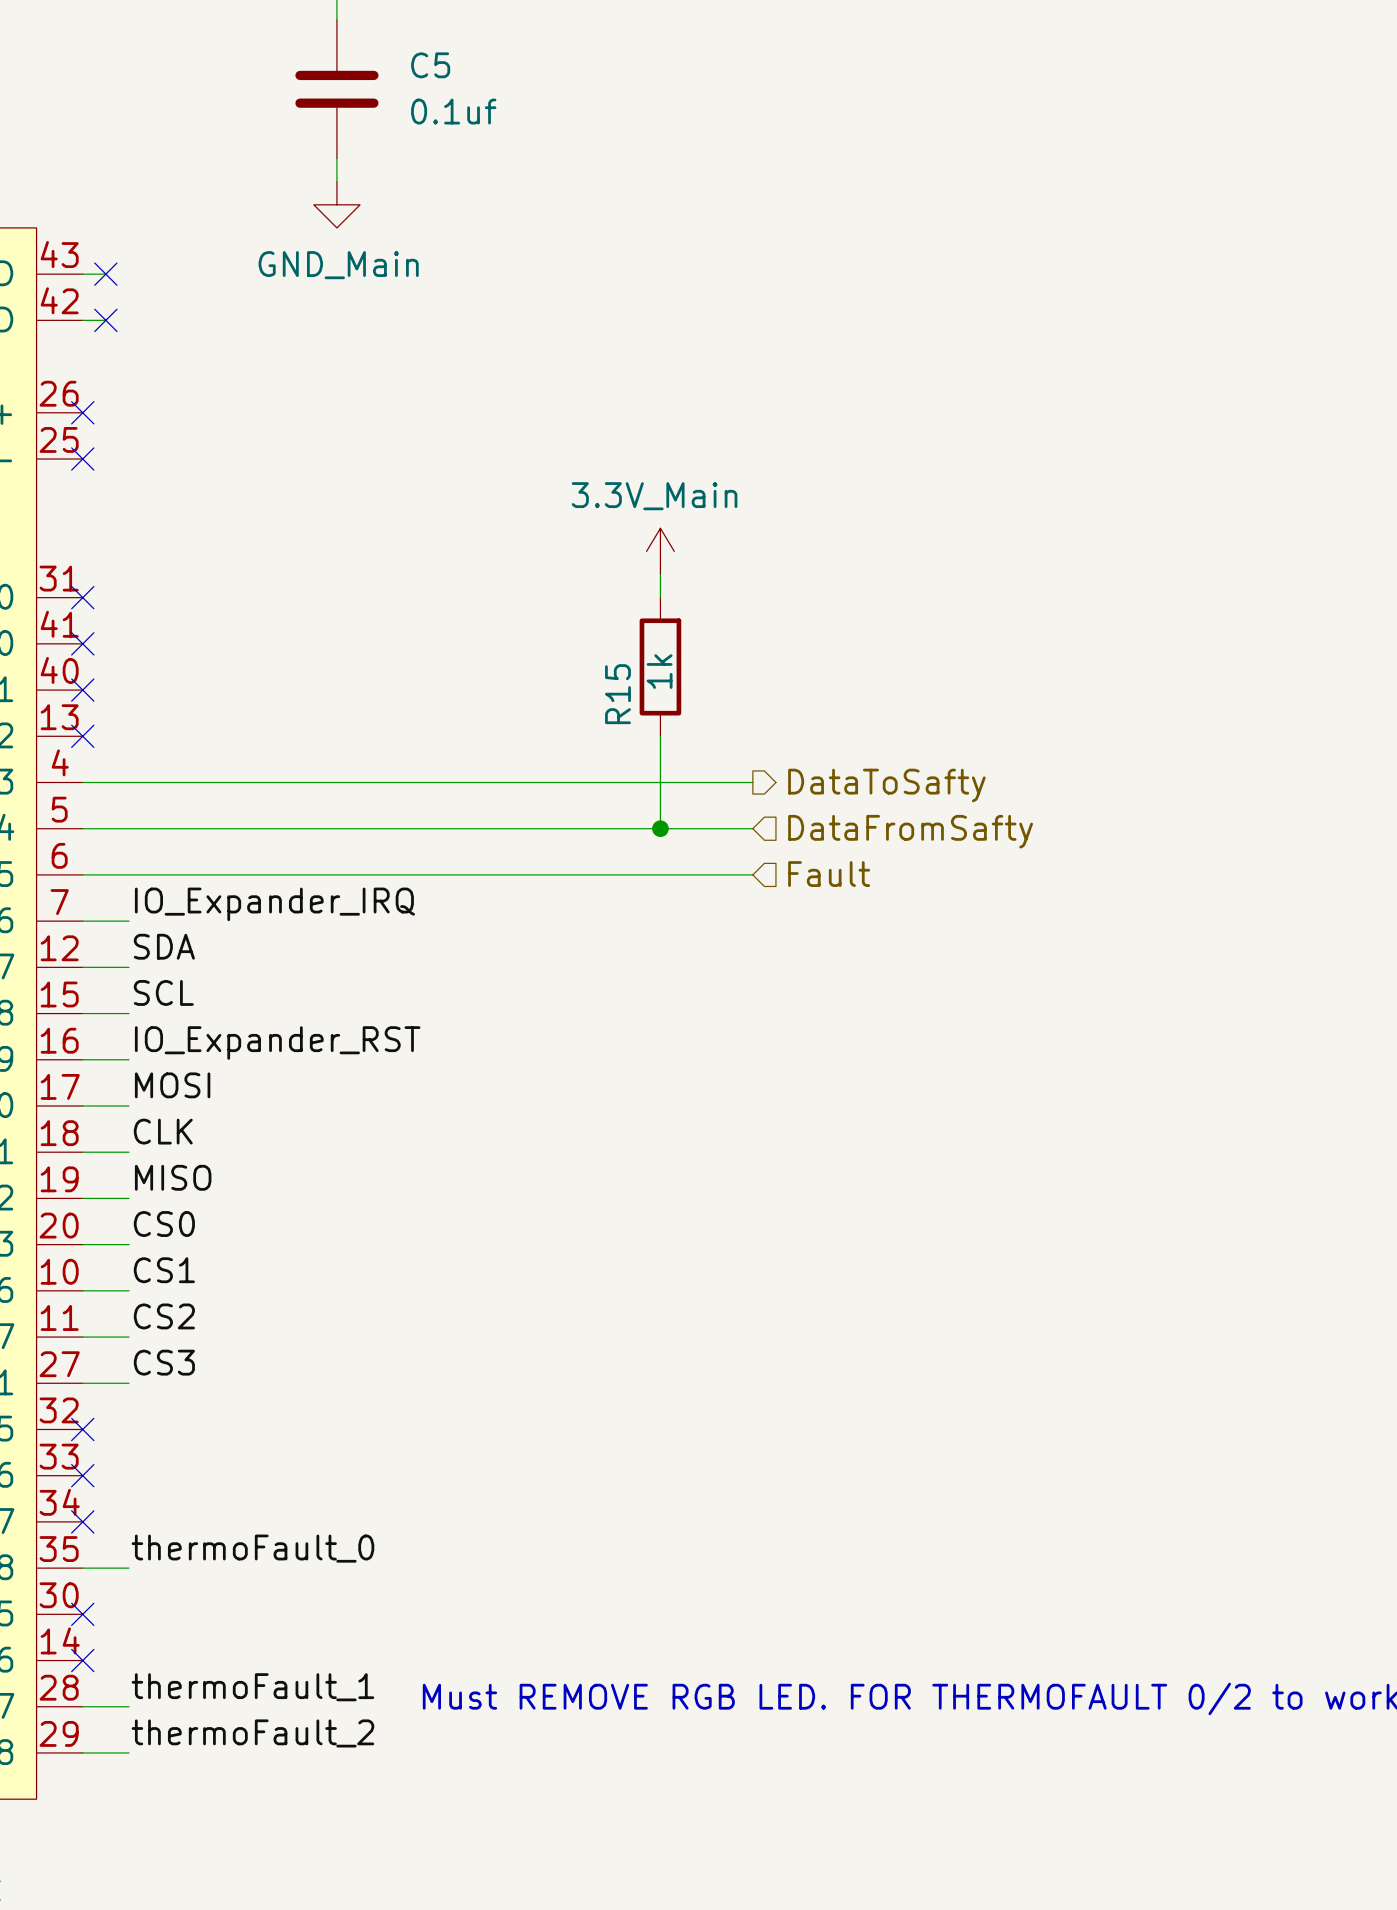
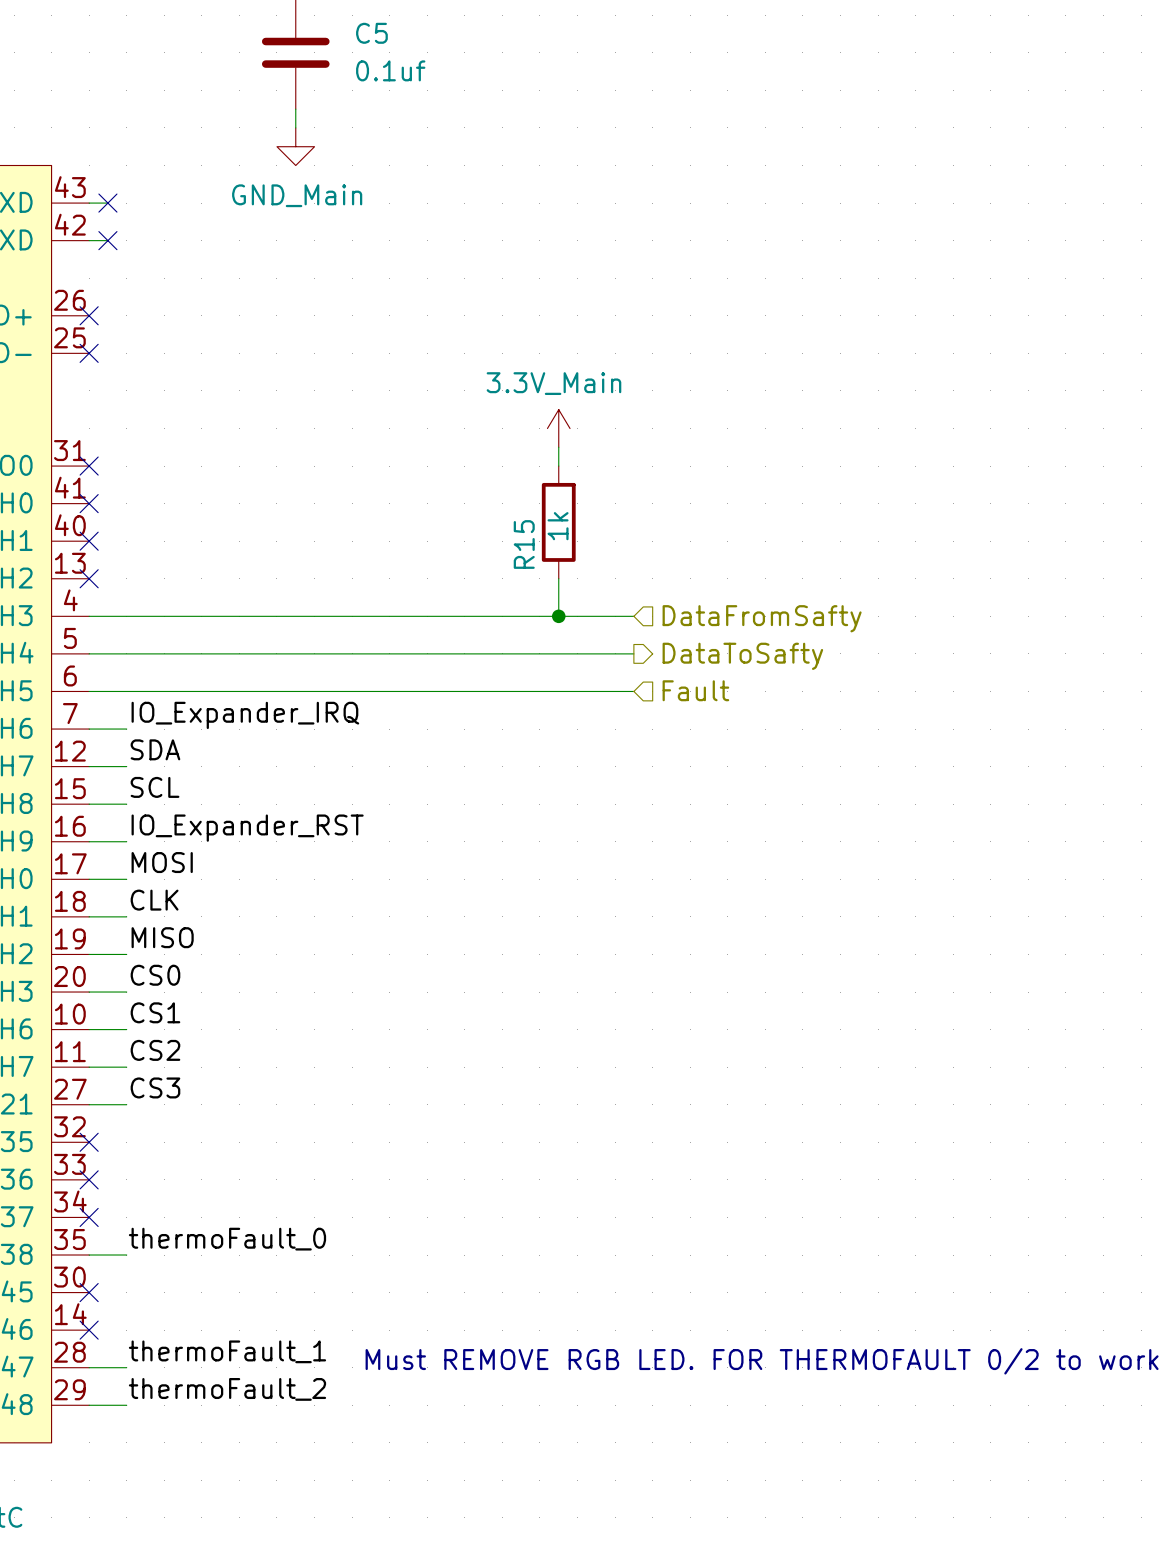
wire: (660, 782) (660, 828) -> none
hierarchical label shape: output (886, 785) -> input (762, 618)
hierarchical label: DataToSafty (886, 785) -> DataFromSafty (762, 618)
junction position: (660, 828) -> (558, 616)
hierarchical label shape: input (910, 831) -> output (742, 656)
hierarchical label: DataFromSafty (910, 831) -> DataToSafty (742, 656)

